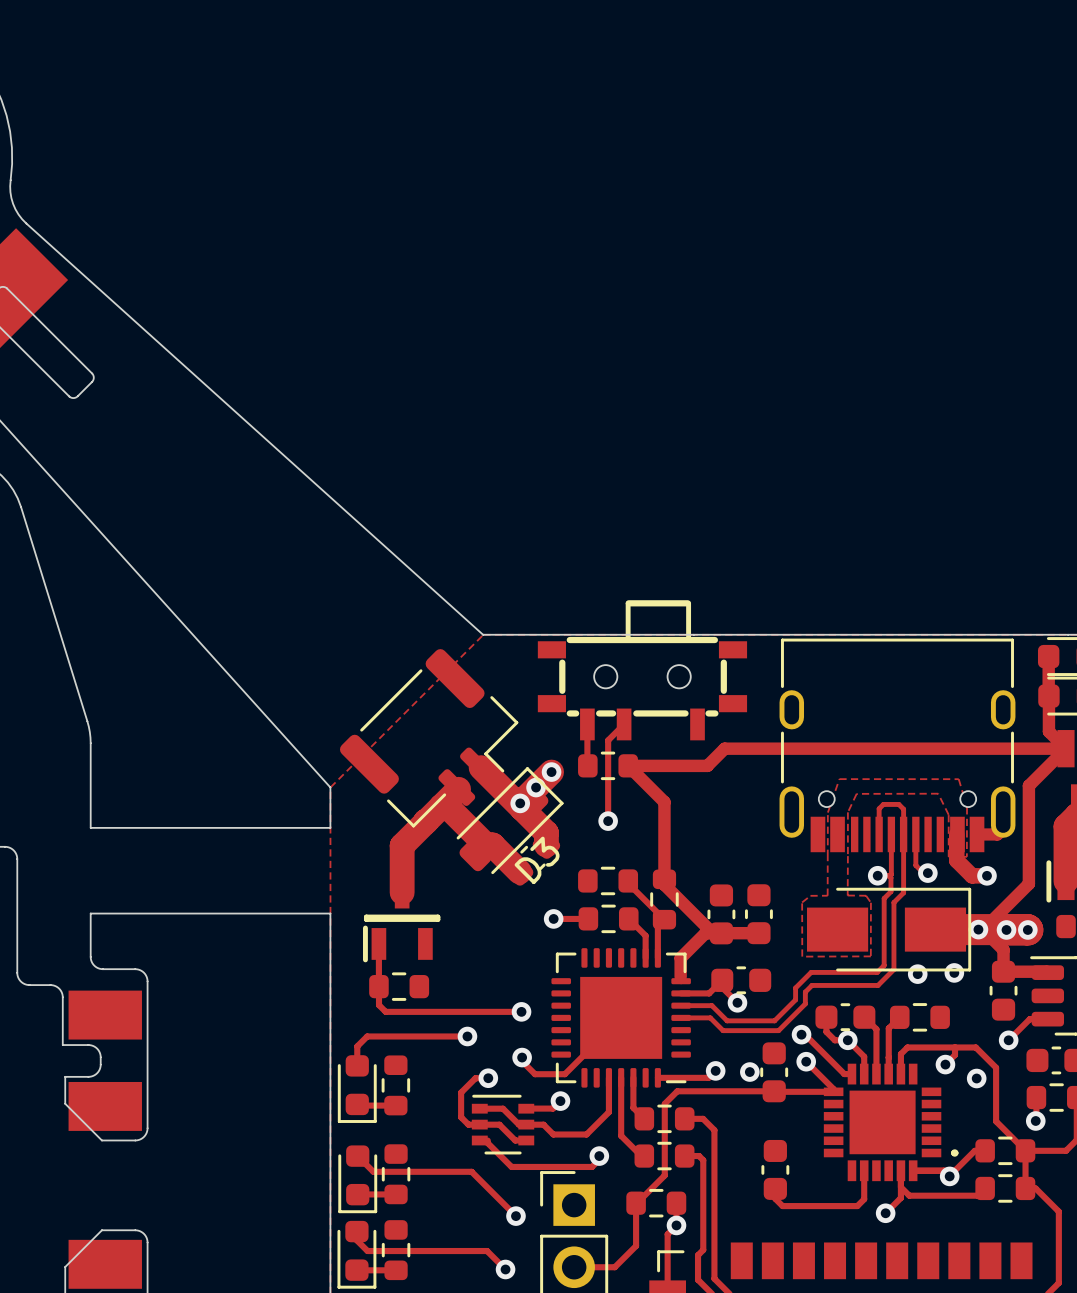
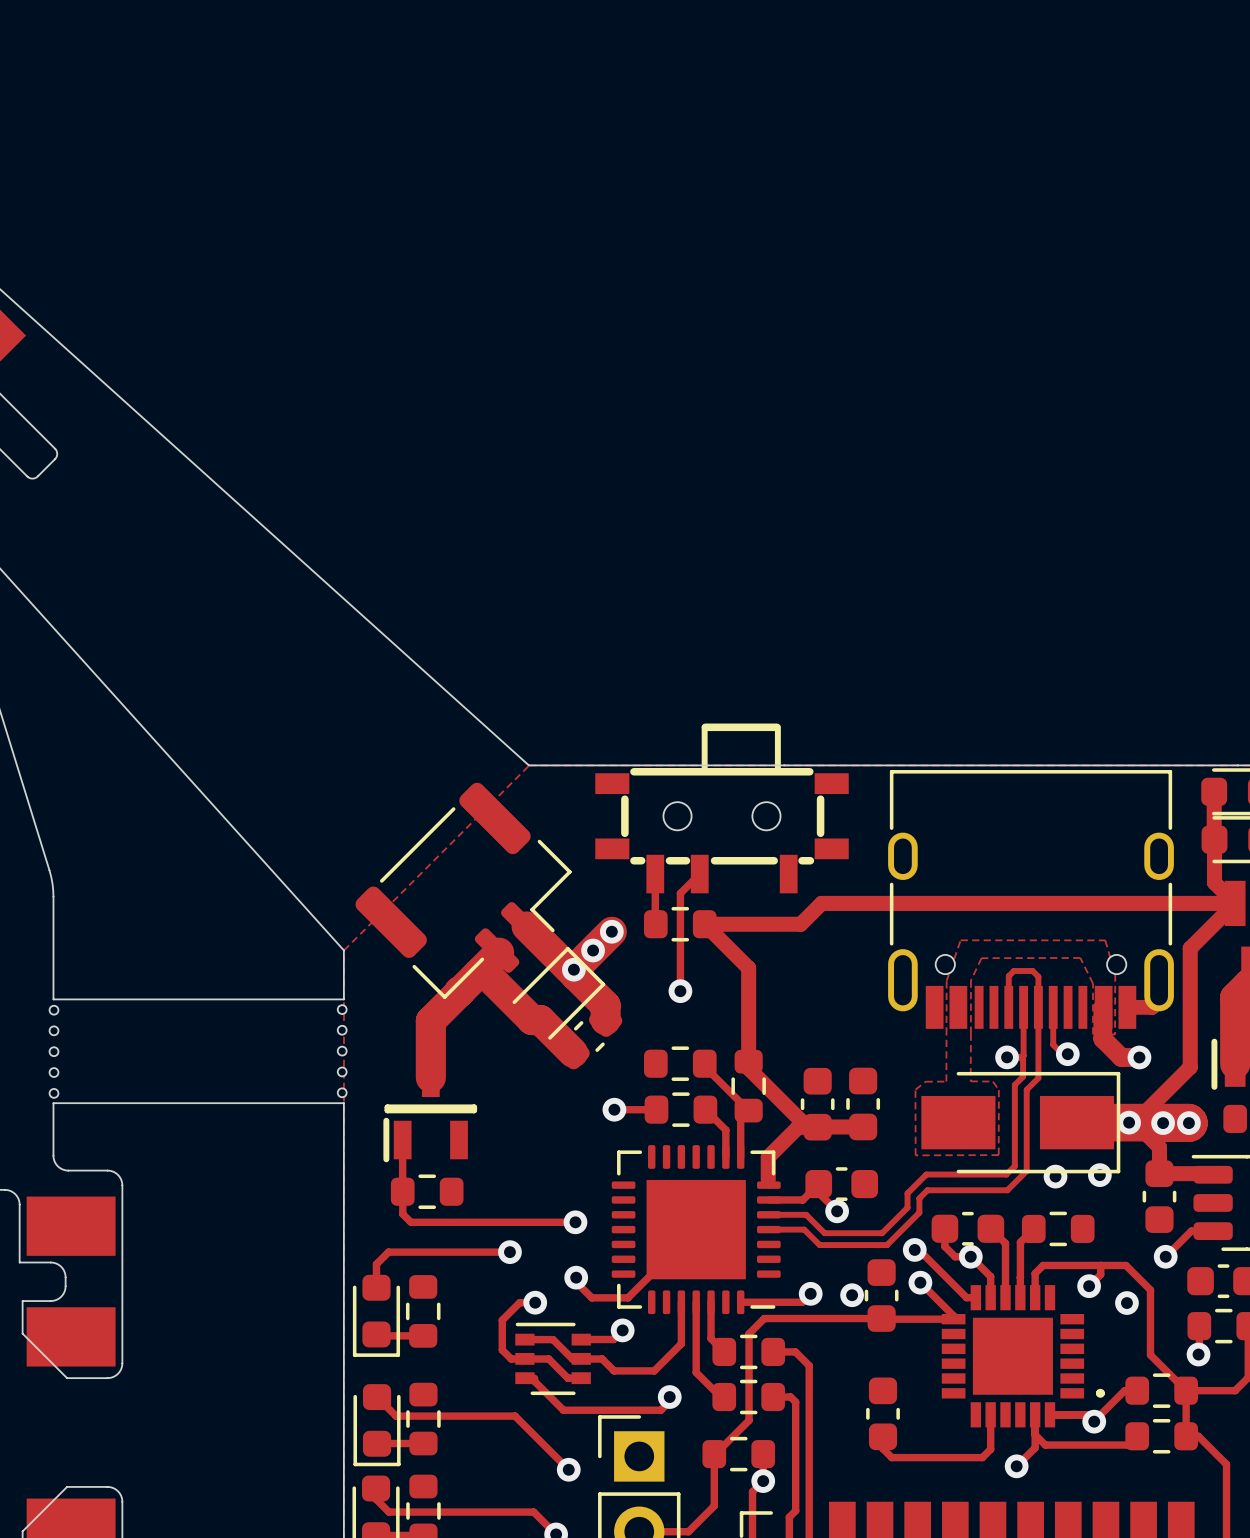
D3: (510, 820) -> none
part: none -> (558, 993)
part: none -> (54, 1010)
part: none -> (342, 1009)
part: none -> (54, 1030)
part: none -> (342, 1030)
part: none -> (342, 1051)
part: none -> (54, 1051)
part: none -> (342, 1071)
part: none -> (54, 1072)
part: none -> (342, 1092)
part: none -> (54, 1093)

